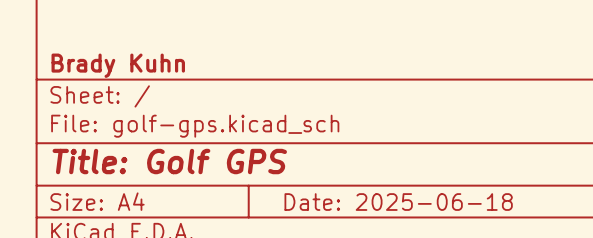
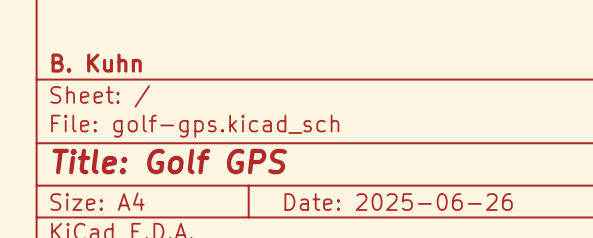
title block: Brady Kuhn (118, 65) -> B. Kuhn (96, 63)
title block: Date: 2025-06-18 (398, 202) -> Date: 2025-06-26 (398, 202)

